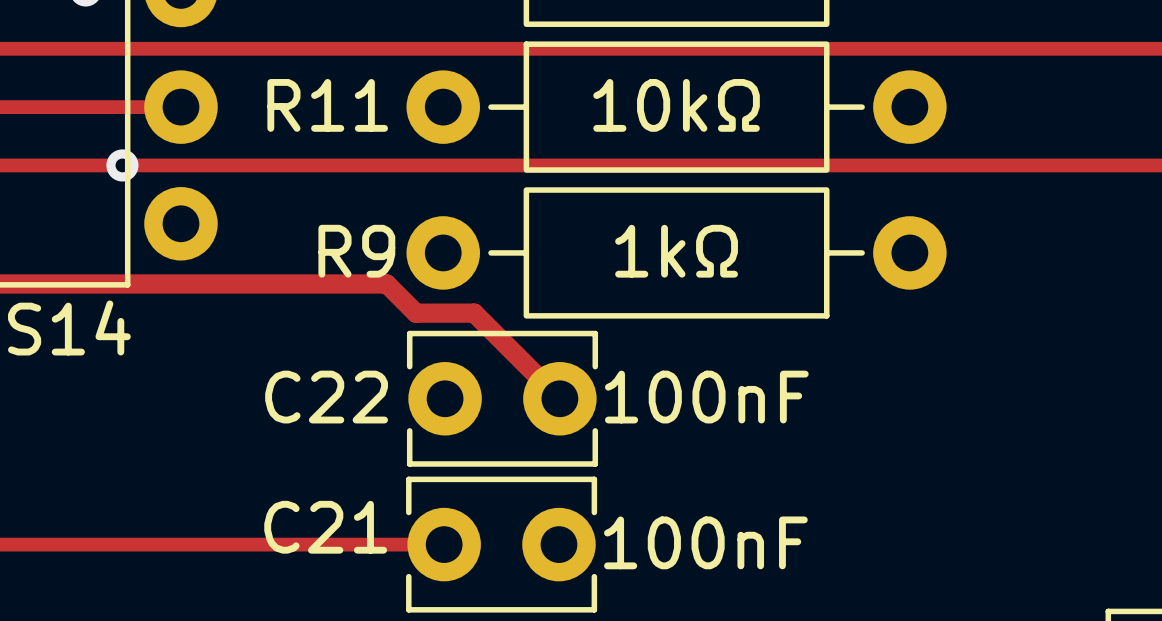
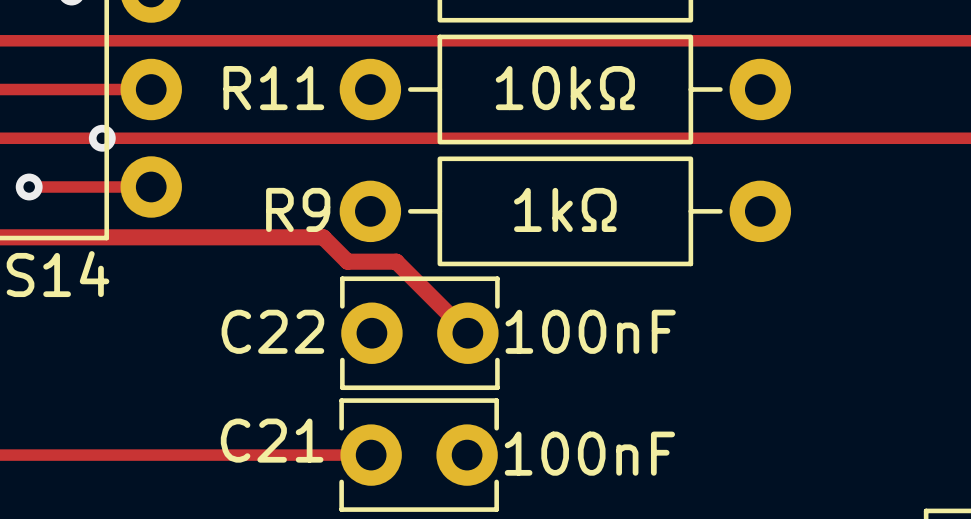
track: none -> (29, 186) (151, 186)
via: none -> (29, 186)

